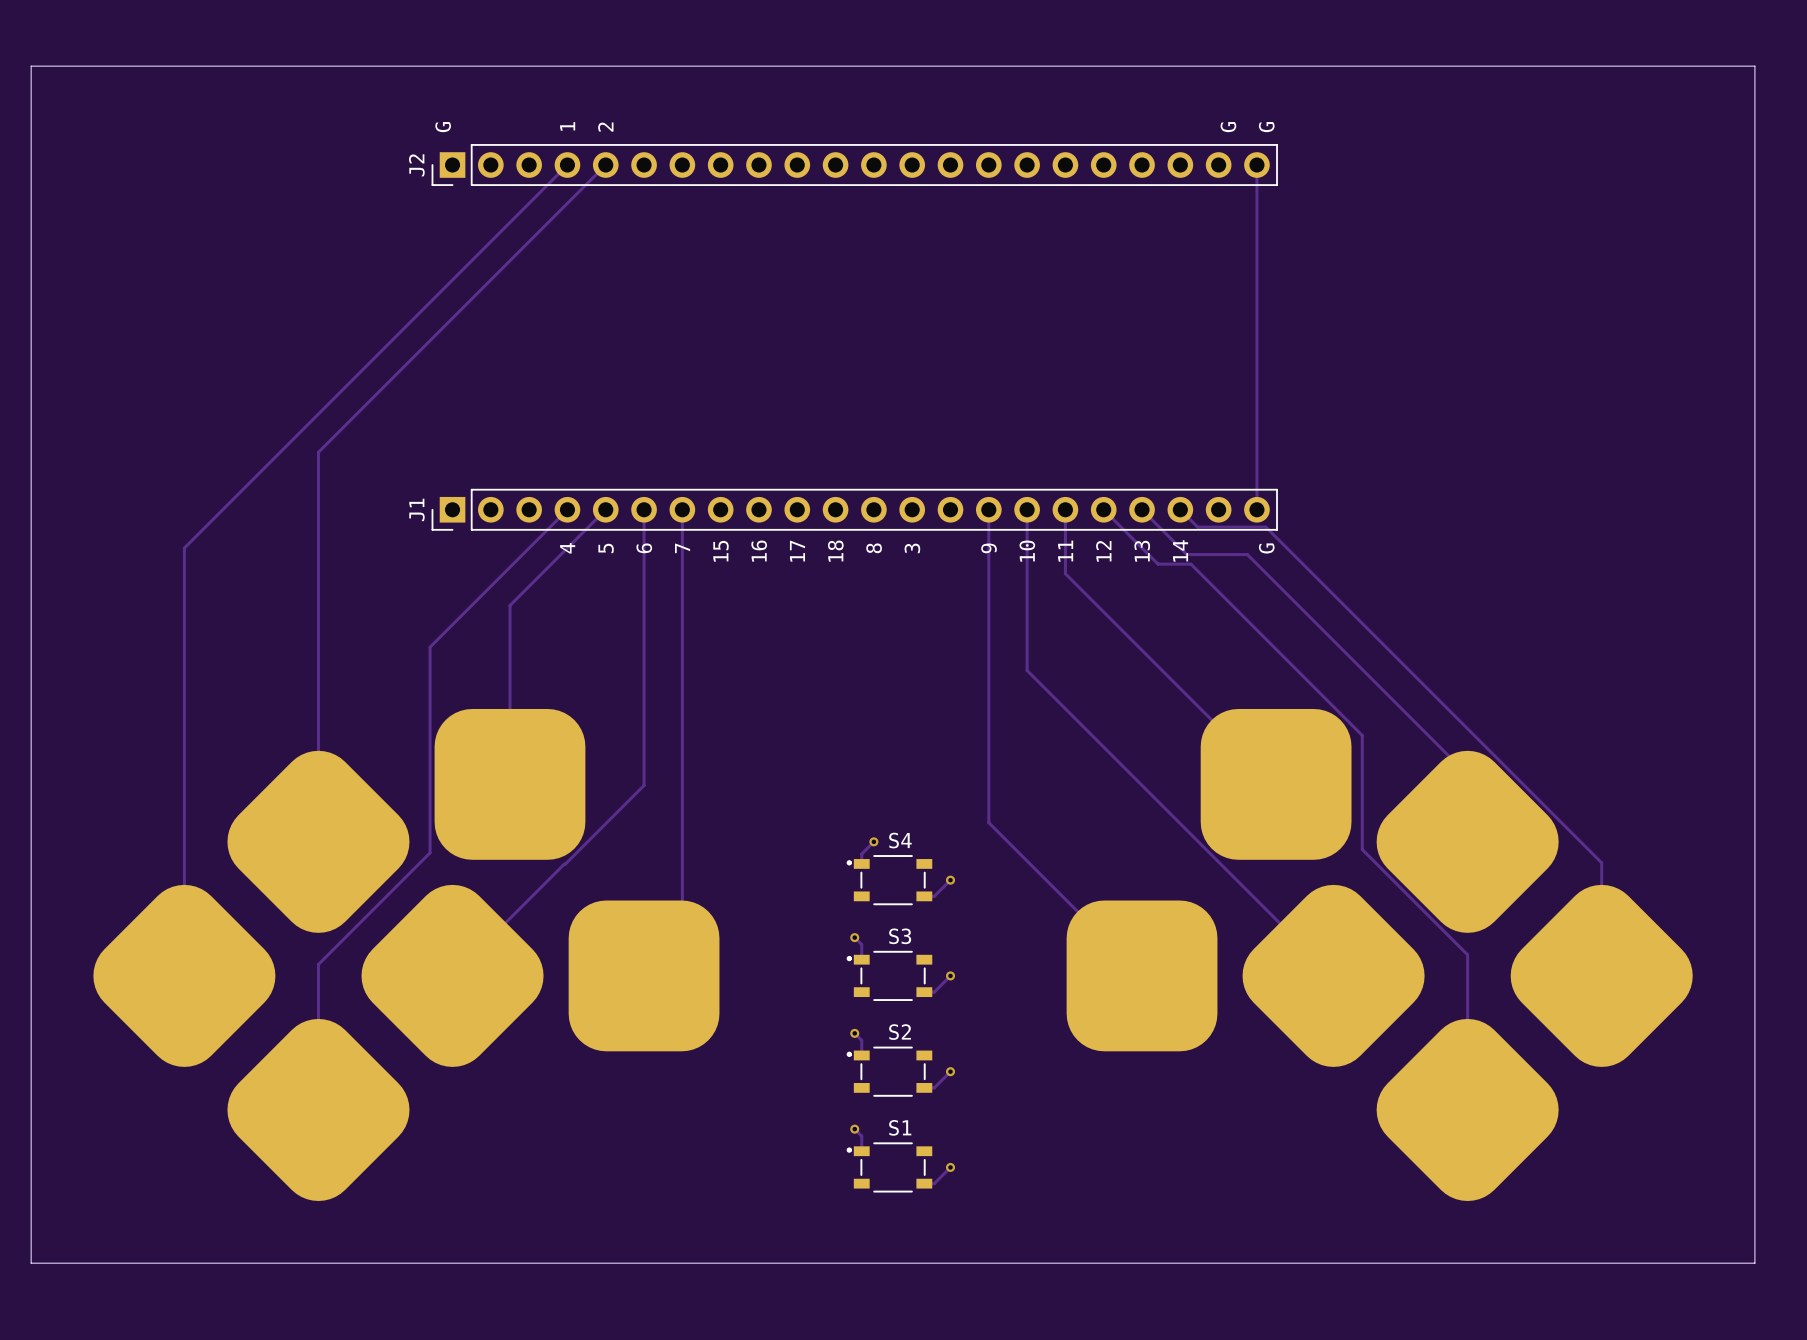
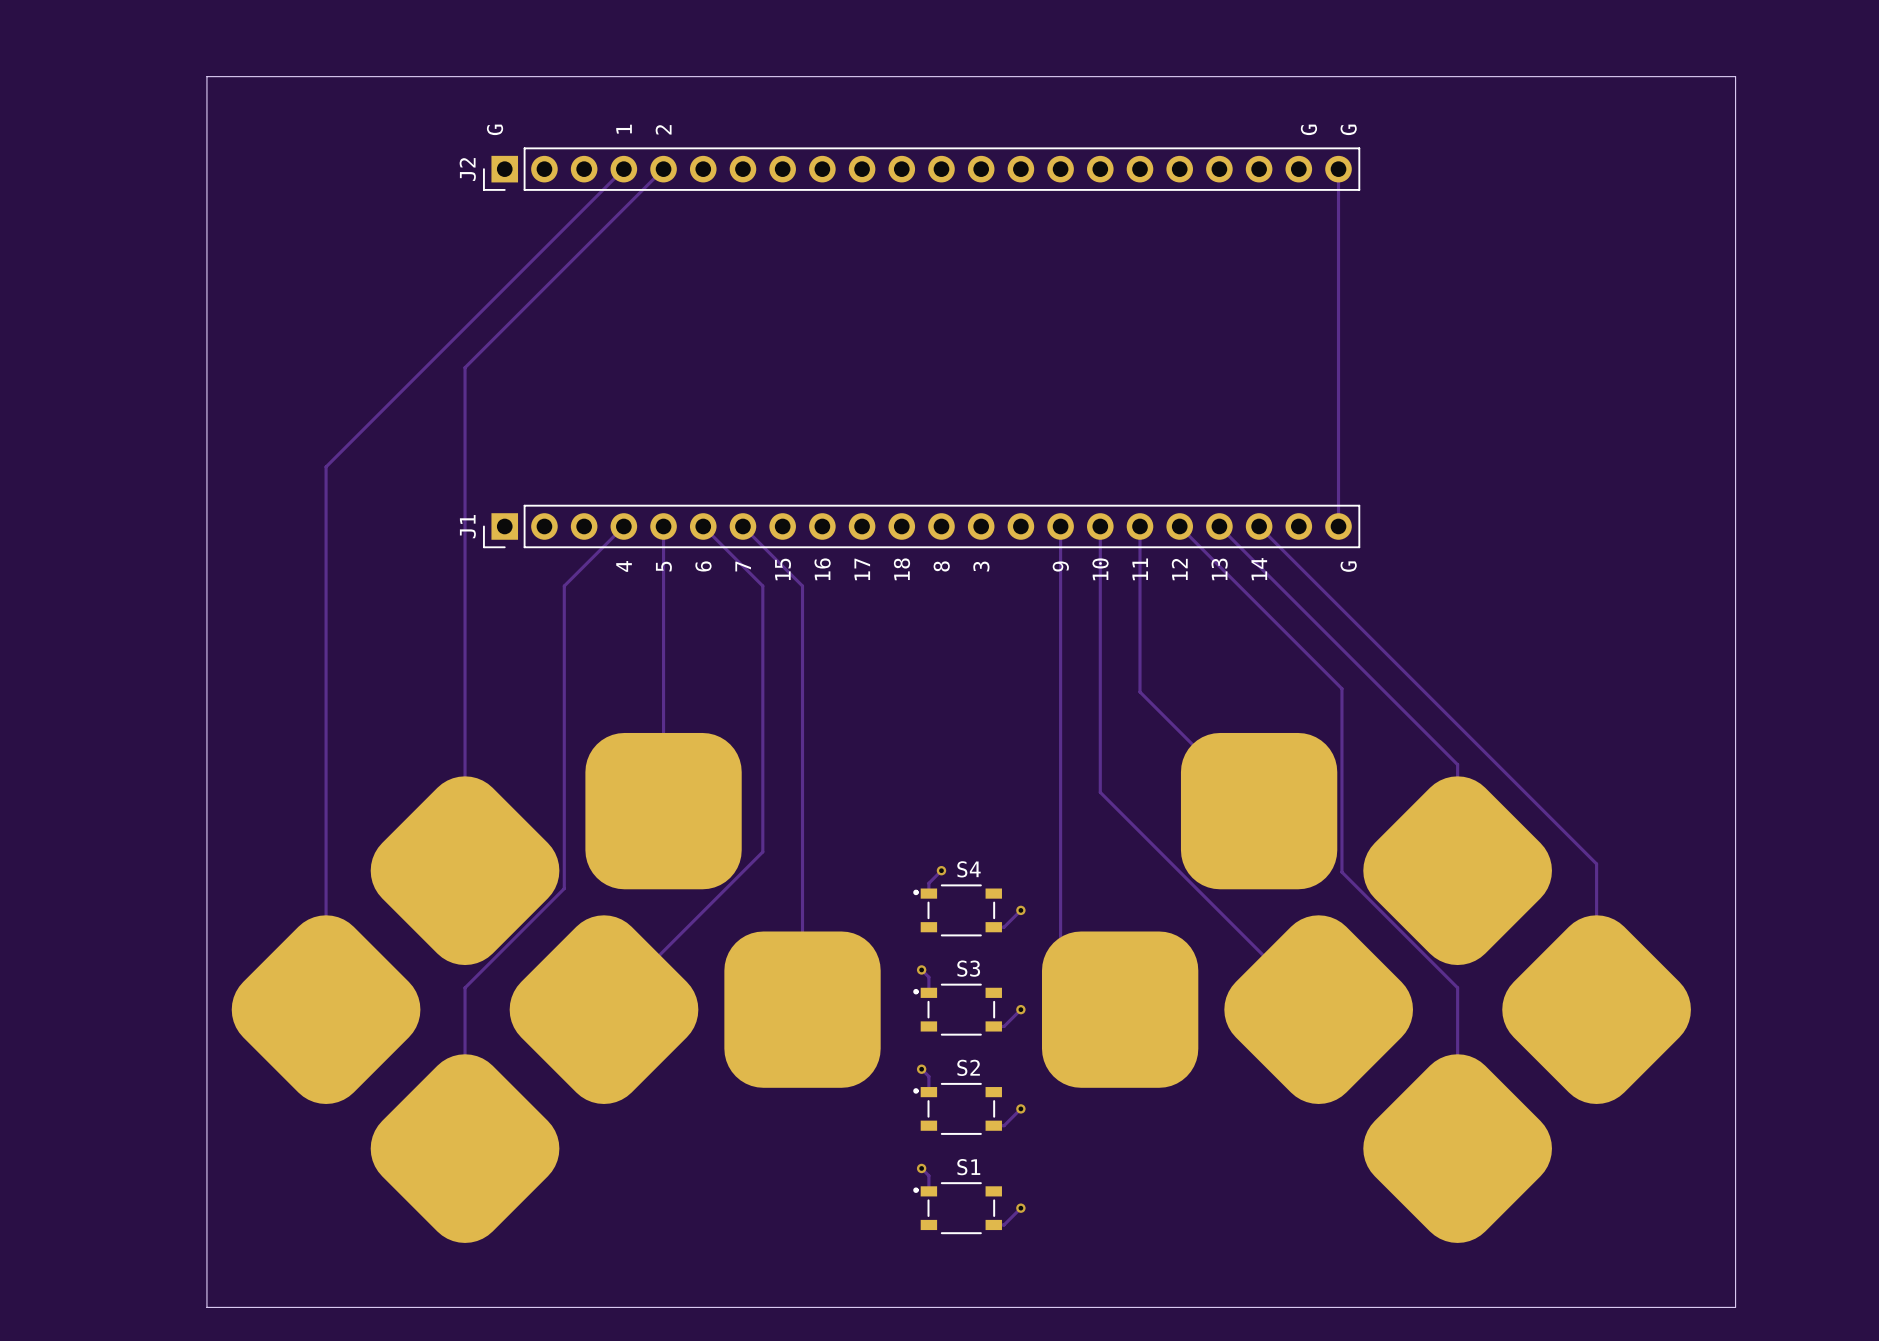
track: (414, 356) (318, 452) (318, 841) -> (465, 367) (465, 870)
track: (280, 452) (184, 548) (184, 975) -> (326, 466) (326, 1009)
track: (605, 509) (509, 605) -> (564, 586) (564, 625)
track: none -> (663, 526) (663, 811)
track: (644, 509) (644, 785) (452, 975) -> (703, 526) (762, 586) (762, 851) (604, 1009)
track: (682, 509) (682, 947) (653, 975) -> (742, 526) (802, 586) (802, 1009)
track: (1197, 527) (1265, 527) (1601, 862) (1601, 975) -> (1277, 544) (1596, 863) (1596, 1009)
track: (1186, 554) (1247, 554) (1467, 774) (1467, 841) -> (1265, 572) (1457, 764) (1457, 870)
track: (1158, 564) (1190, 564) (1362, 735) (1362, 849) (1467, 954) (1467, 1109) -> (1236, 582) (1341, 688) (1341, 872) (1457, 987) (1457, 1148)
track: (509, 567) (430, 647) (430, 852) (318, 964) (318, 1109) -> none
track: (1065, 573) (1276, 784) -> (1140, 592) (1140, 692) (1259, 811)
track: (1027, 670) (1333, 975) -> (1100, 693) (1100, 792) (1318, 1009)
track: none -> (564, 811) (564, 888) (465, 987) (465, 1148)
part position: (509, 784) -> (663, 811)
part position: (1276, 784) -> (1259, 811)
track: (988, 822) (1142, 975) -> (1060, 850) (1060, 950) (1120, 1009)
part: (318, 841) -> none
part: none -> (465, 870)
part: none -> (1457, 870)
part: (1467, 841) -> none
part: (184, 975) -> none
part: none -> (326, 1009)
part: (452, 975) -> none
part: none -> (604, 1009)
part position: (644, 975) -> (802, 1009)
part position: (1142, 975) -> (1120, 1009)
part: none -> (1318, 1009)
part: (1333, 975) -> none
part: none -> (1596, 1009)
part: (1601, 975) -> none
part: (318, 1109) -> none
part: none -> (465, 1148)
part: none -> (1457, 1148)
part: (1467, 1109) -> none
board edge: (165, 1263) (31, 1263) (31, 66) (1754, 66) (1754, 1263) (1640, 1263) -> (206, 1307) (206, 76) (1735, 76) (1735, 1307)

